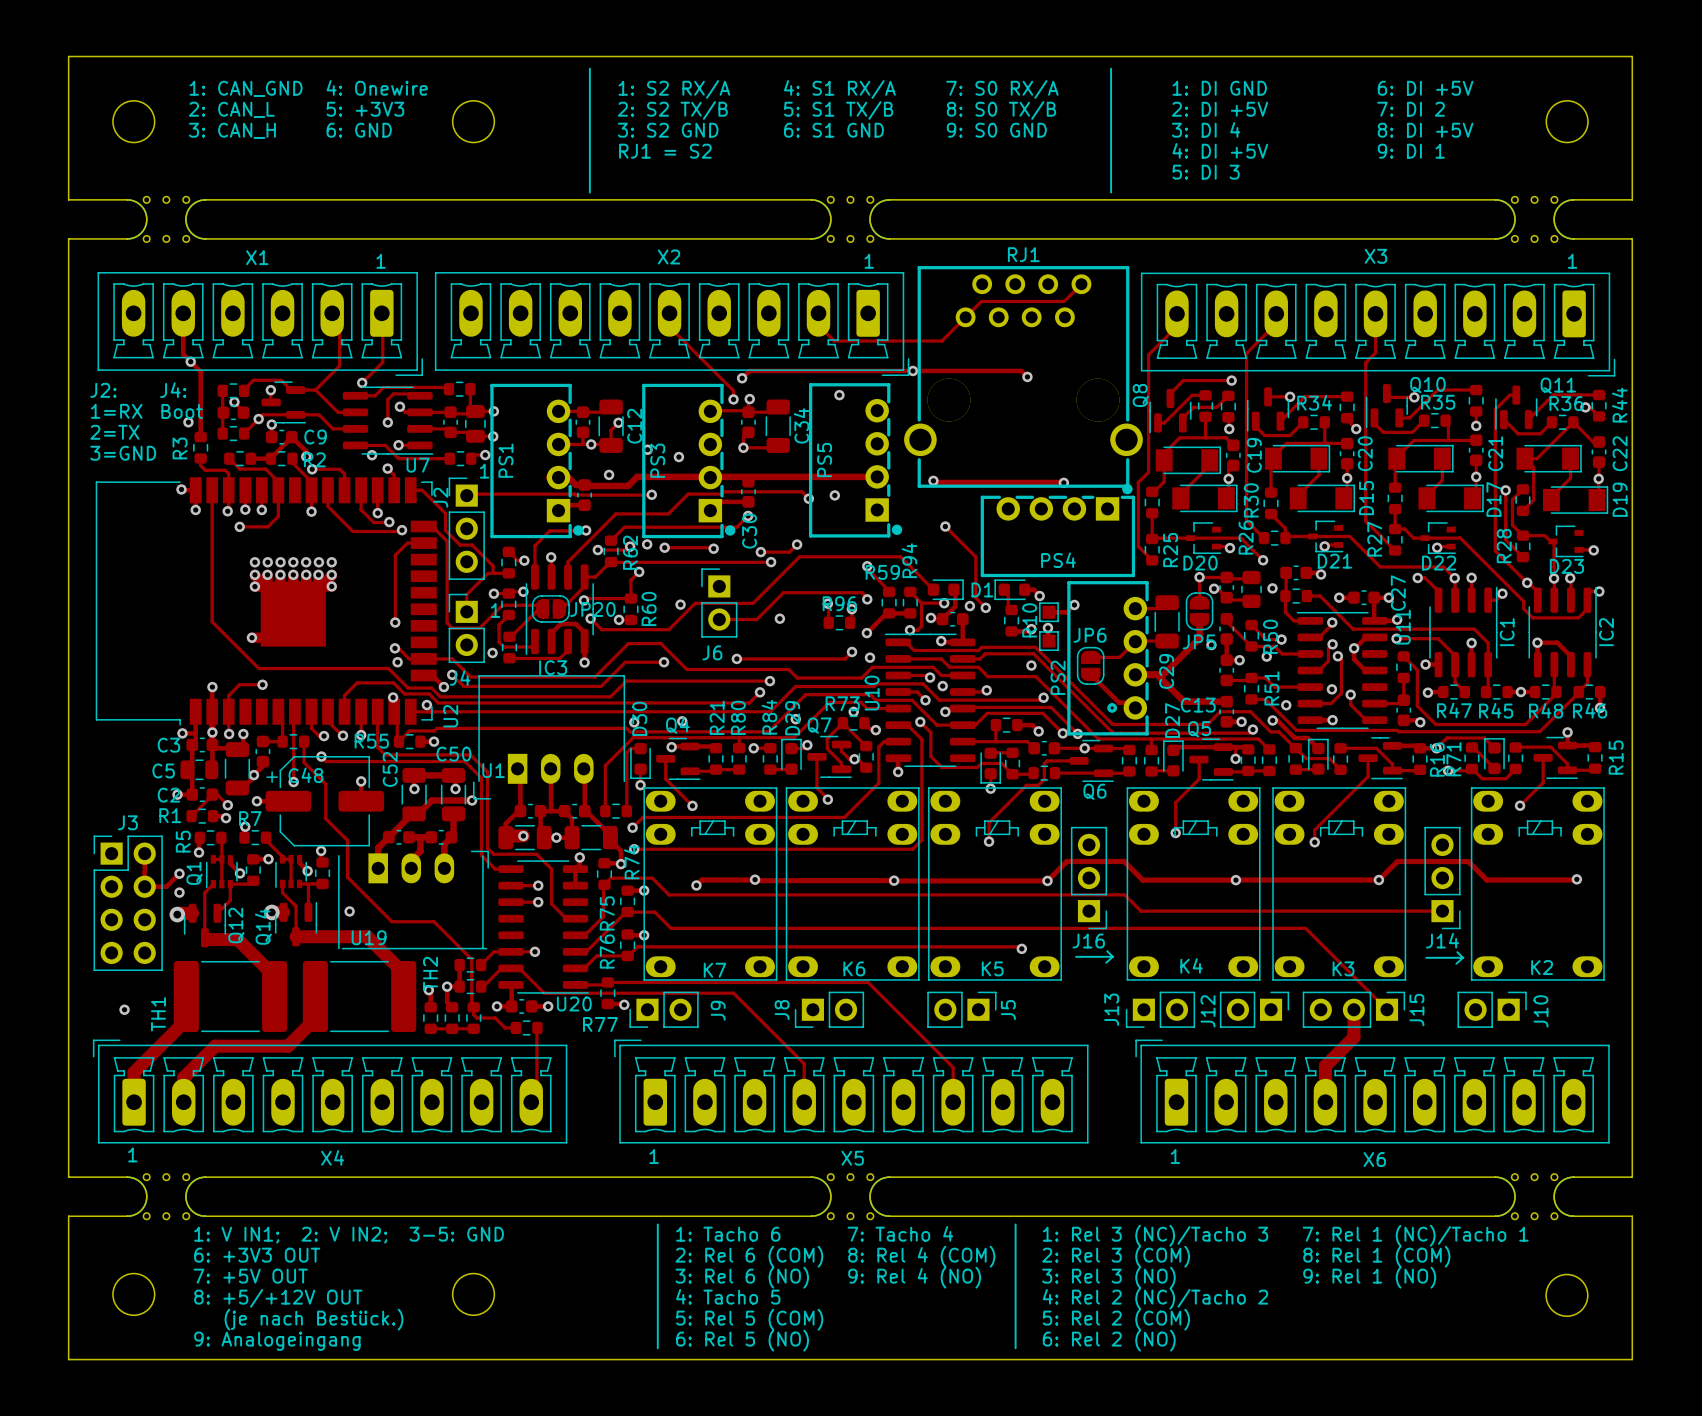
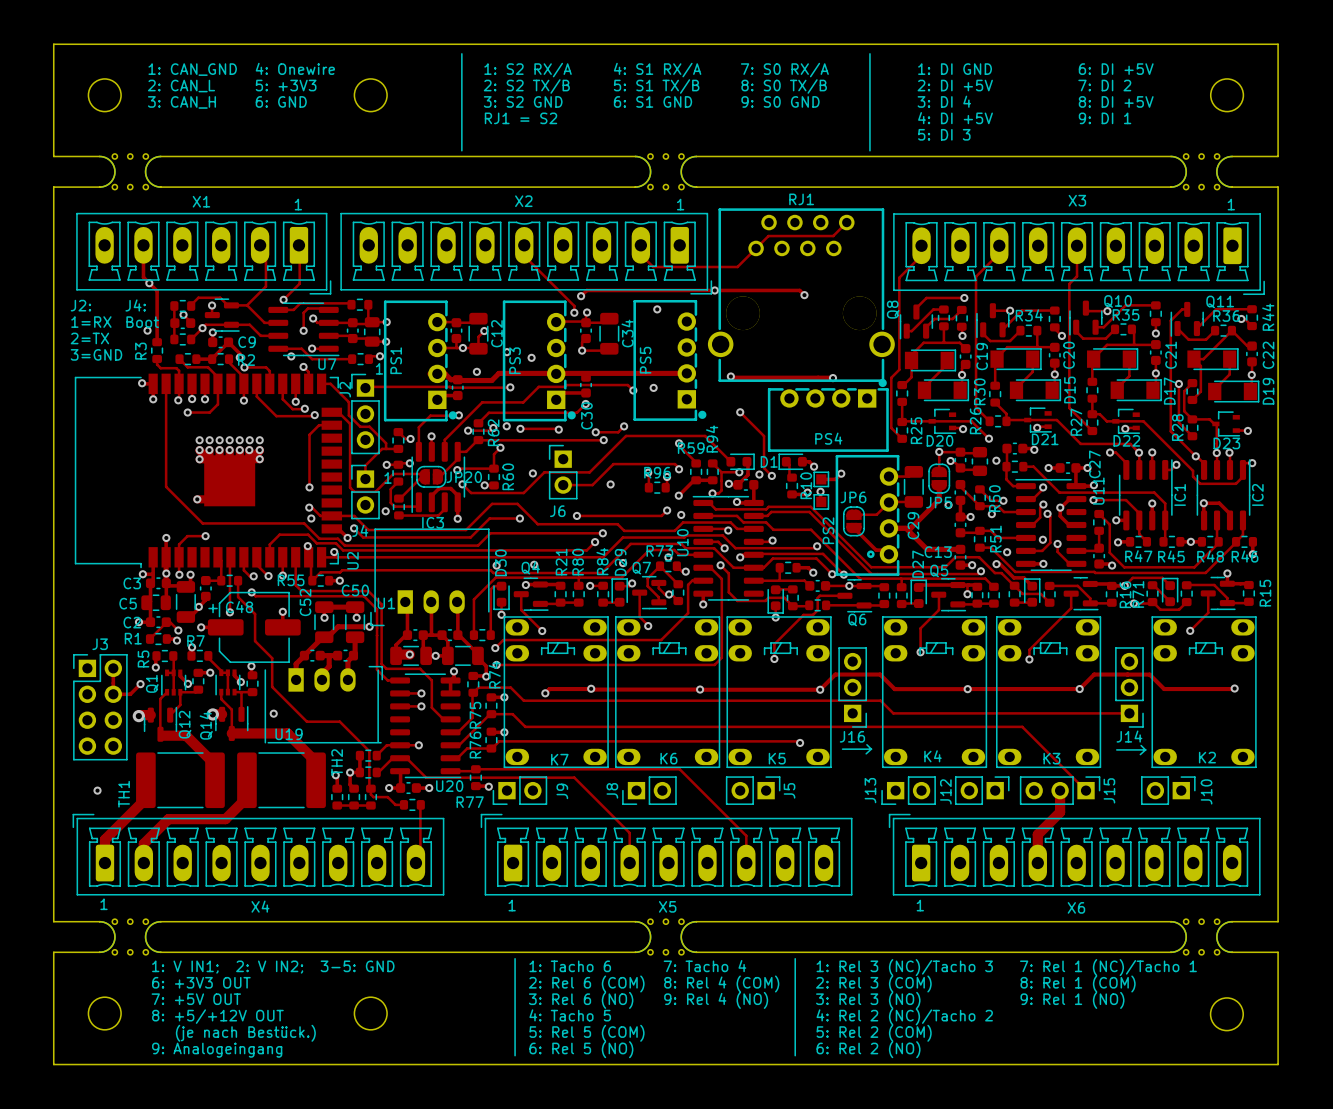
via: (1031, 665) -> none
via: (942, 686) -> none
via: (179, 892) -> none

